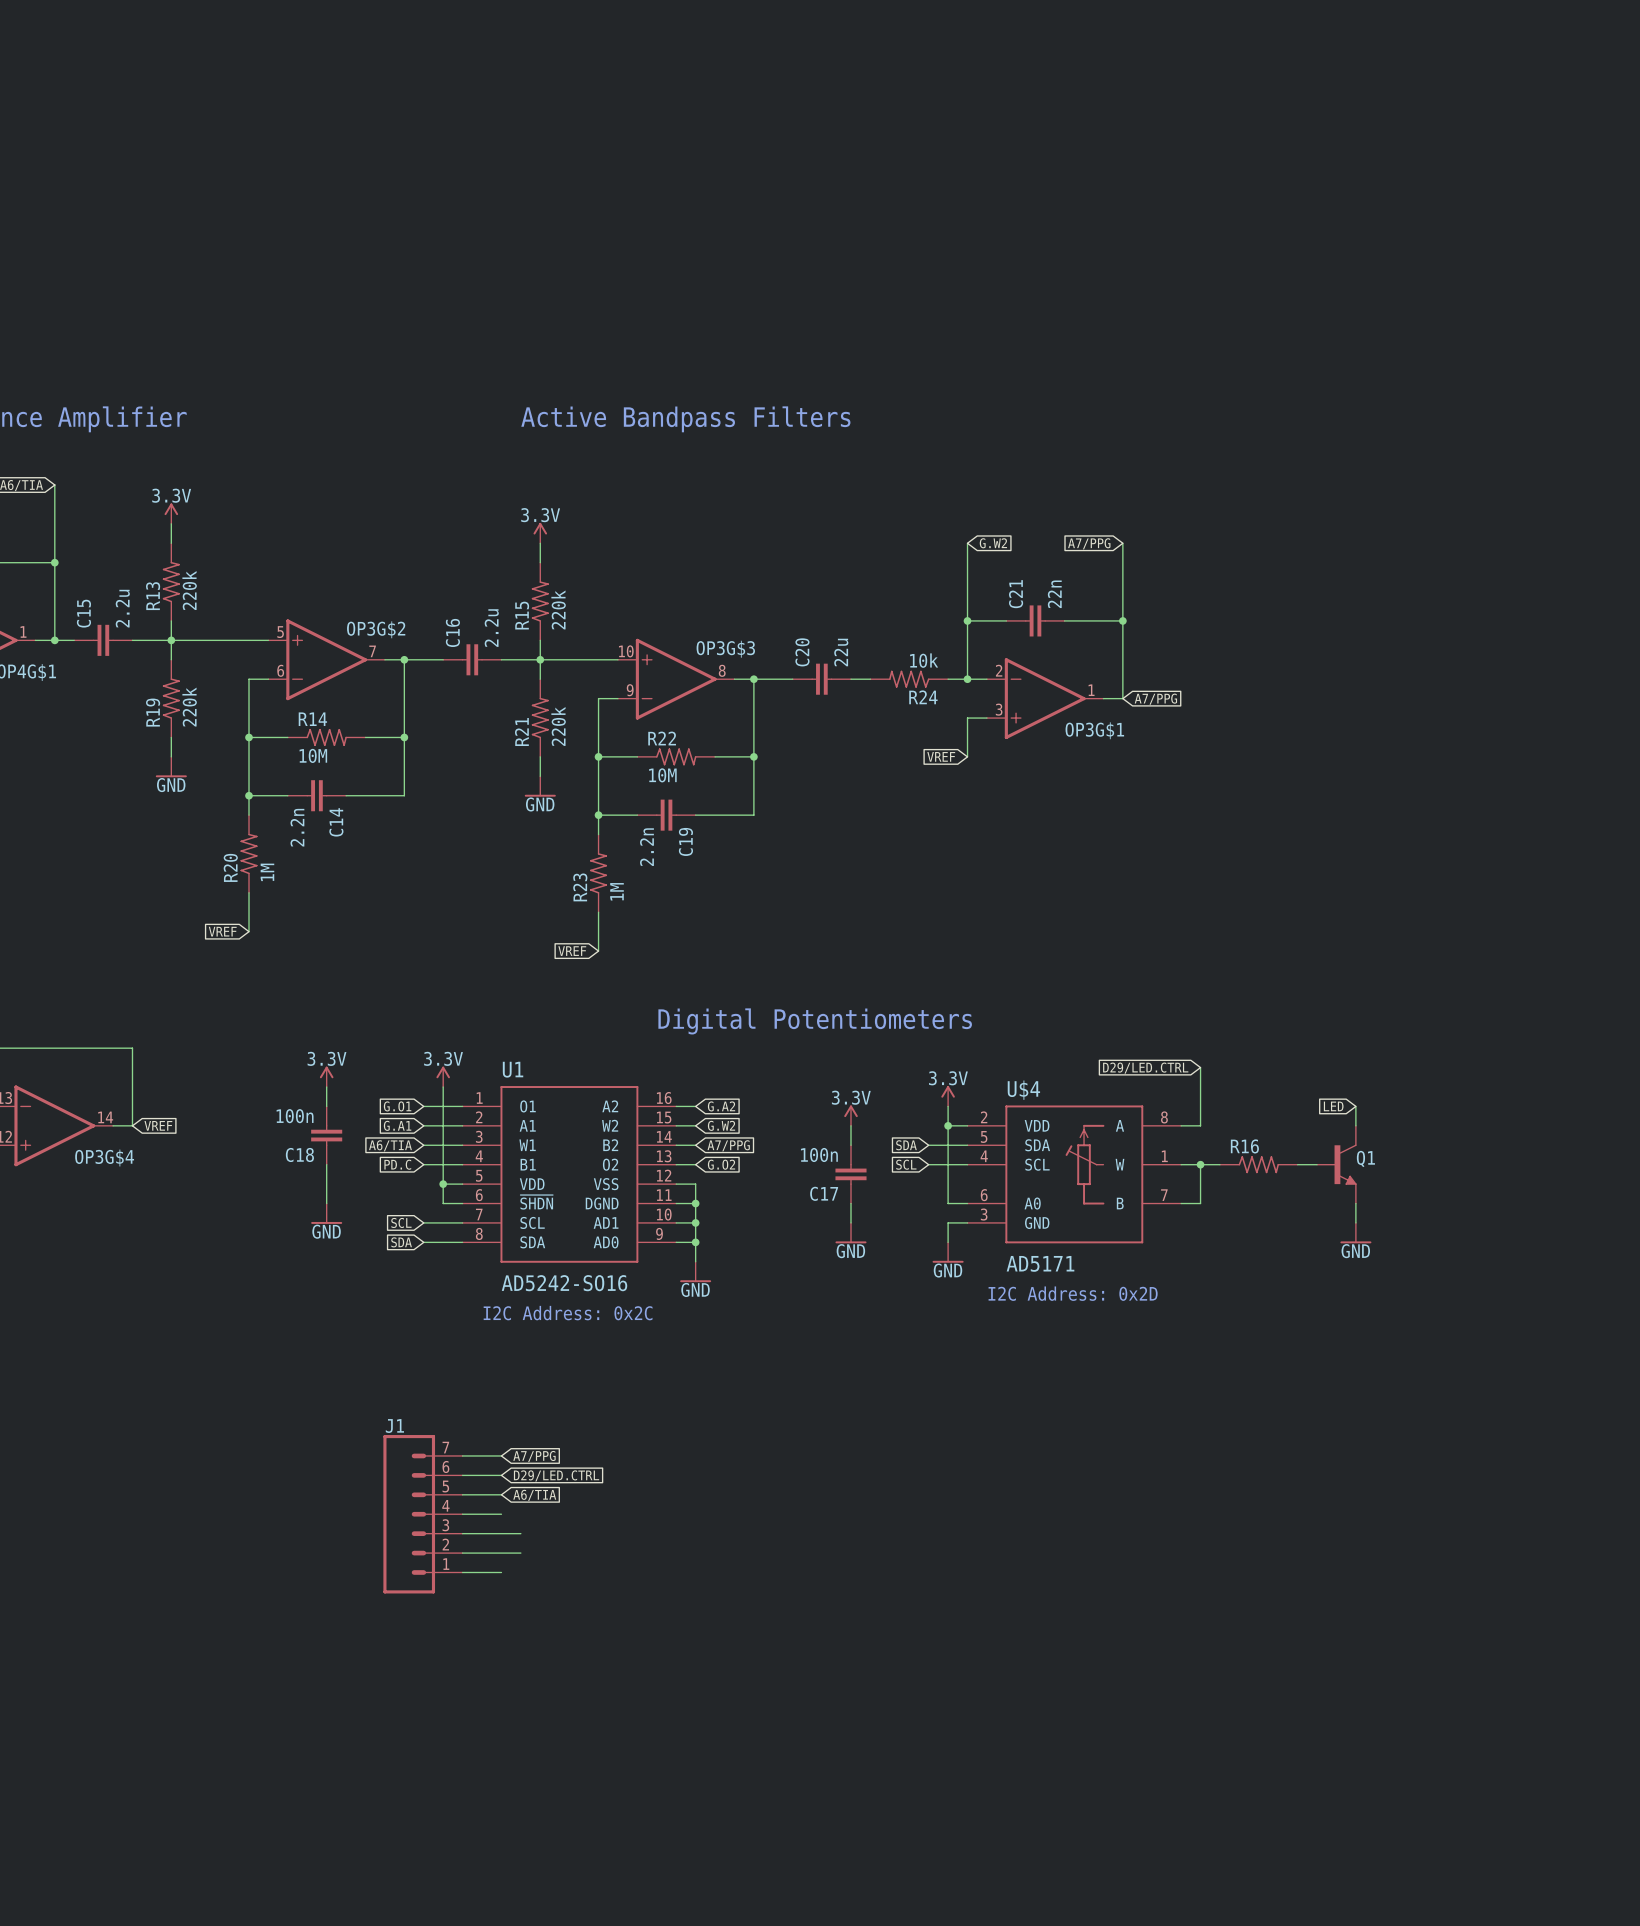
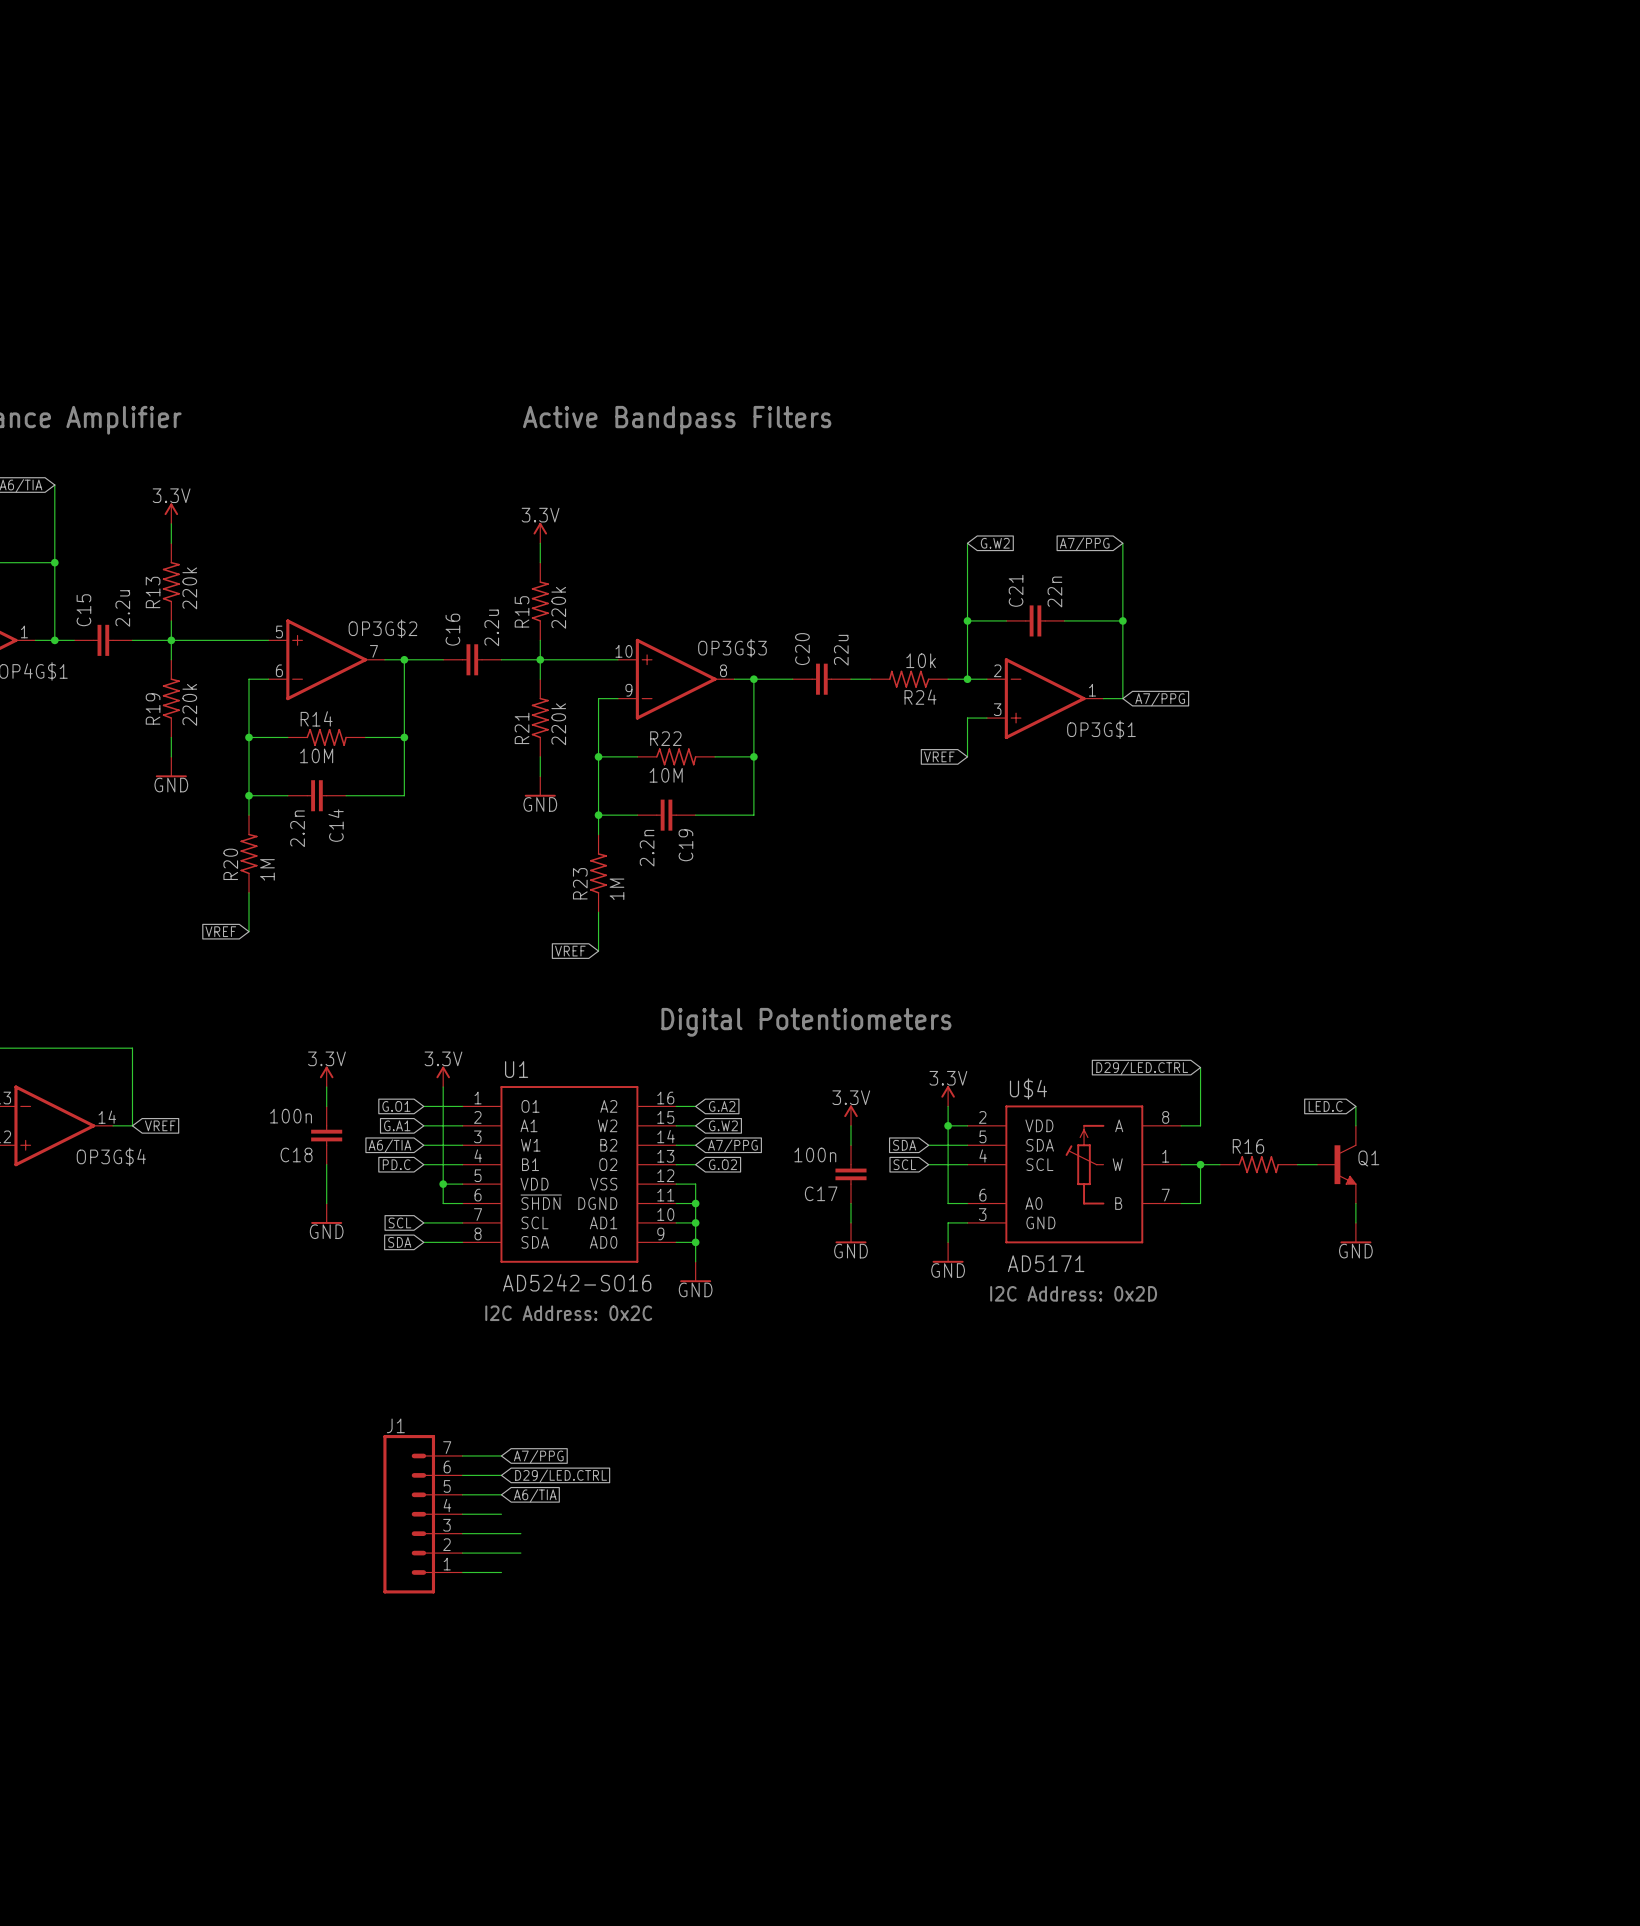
global label: LED (1333, 1106) -> LED.C (1325, 1106)

